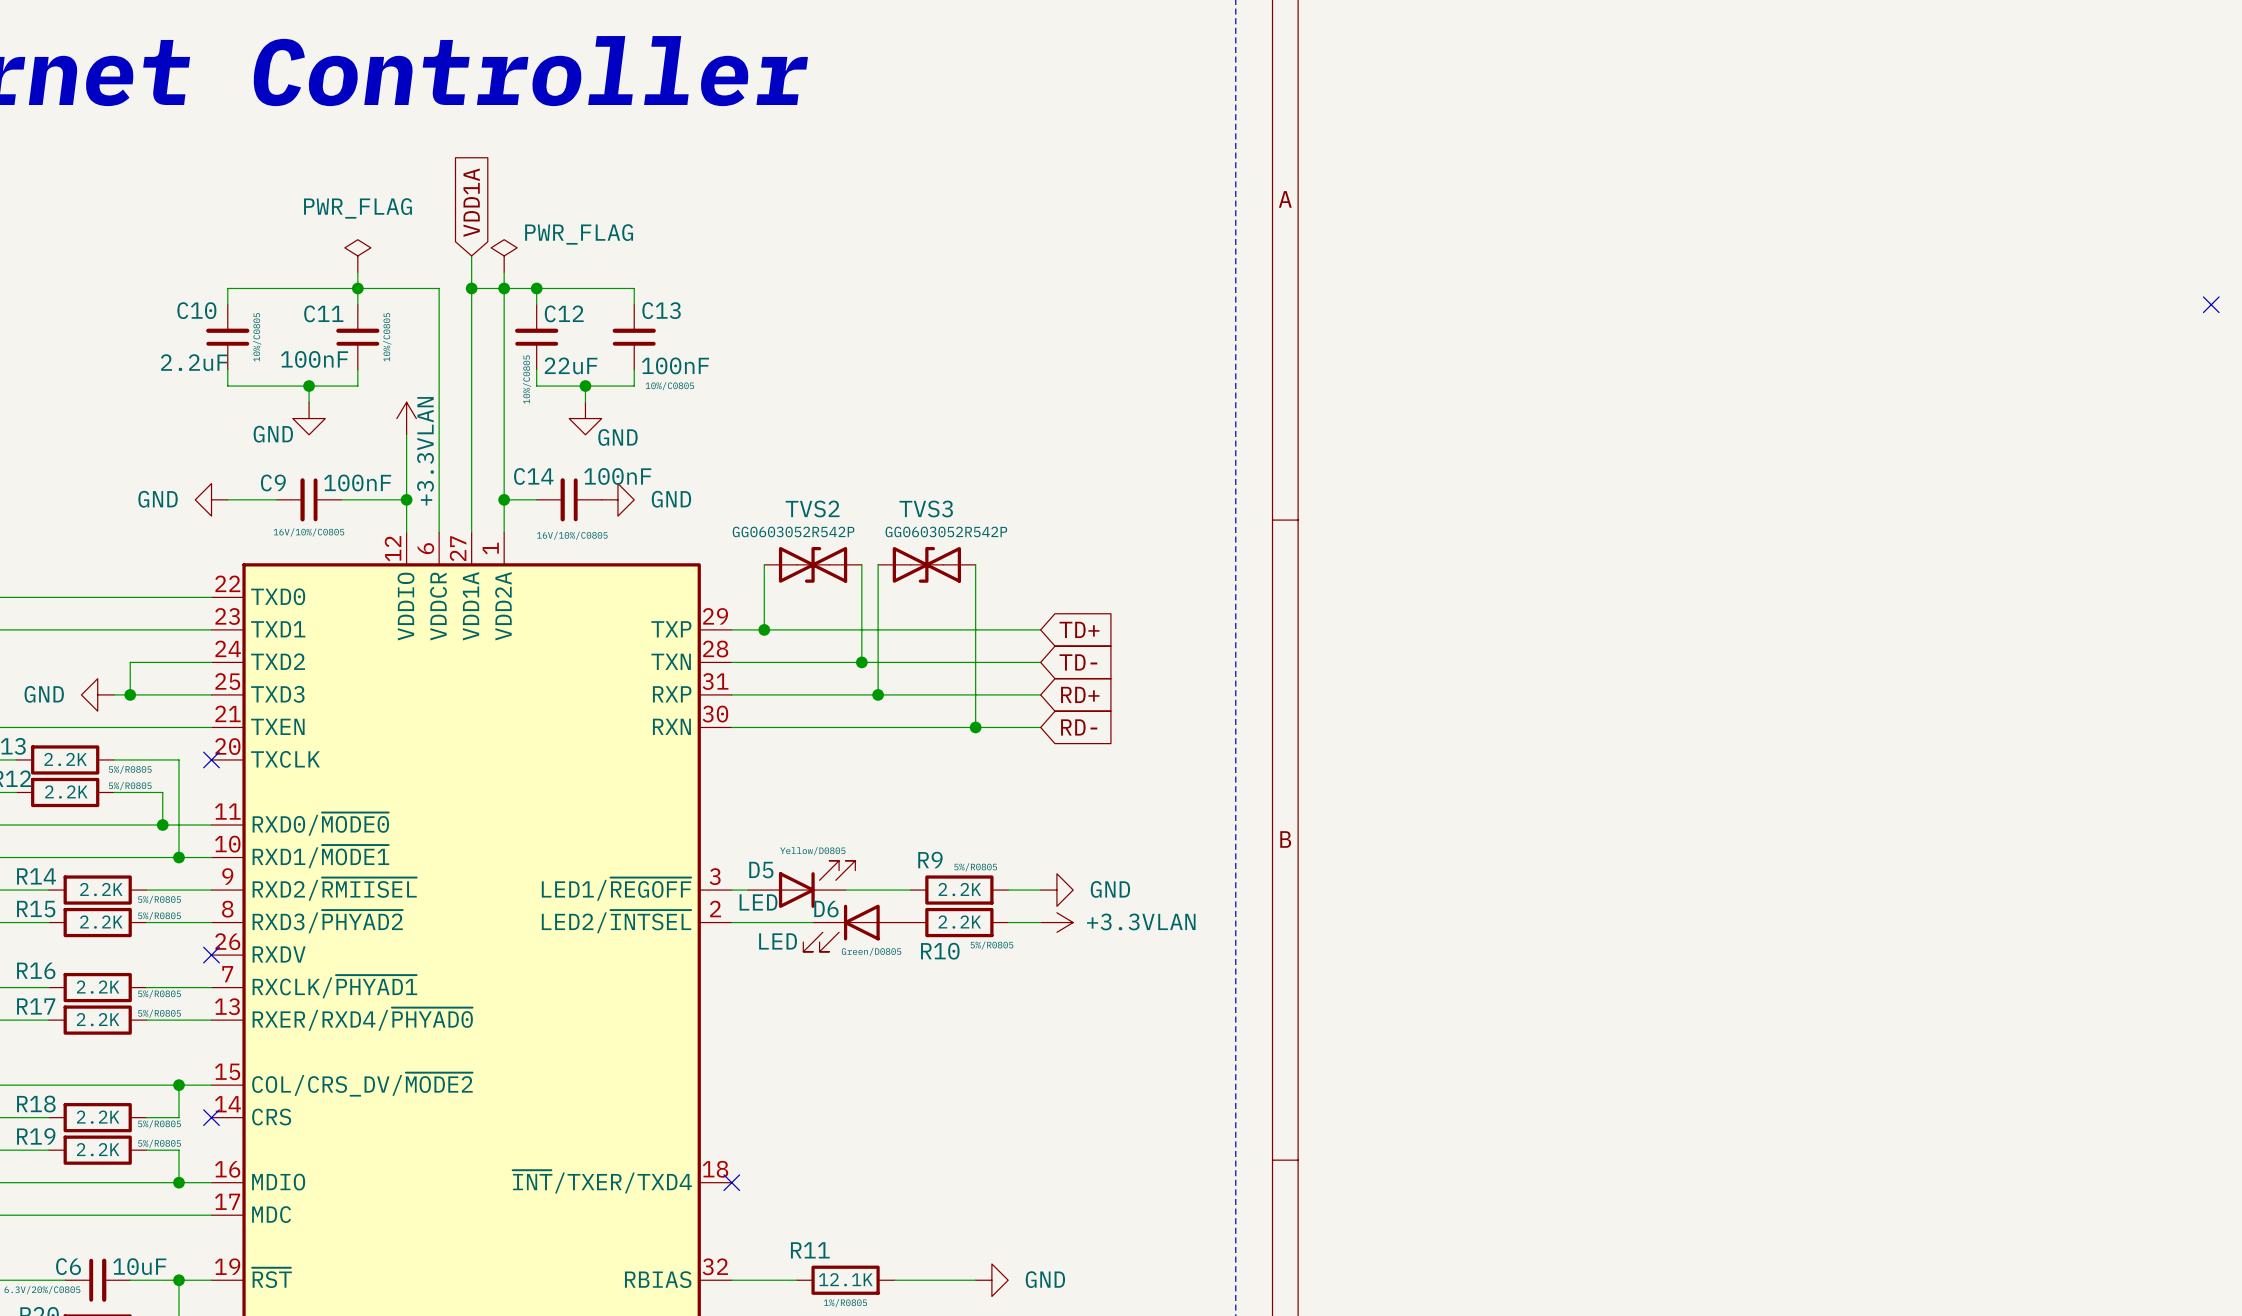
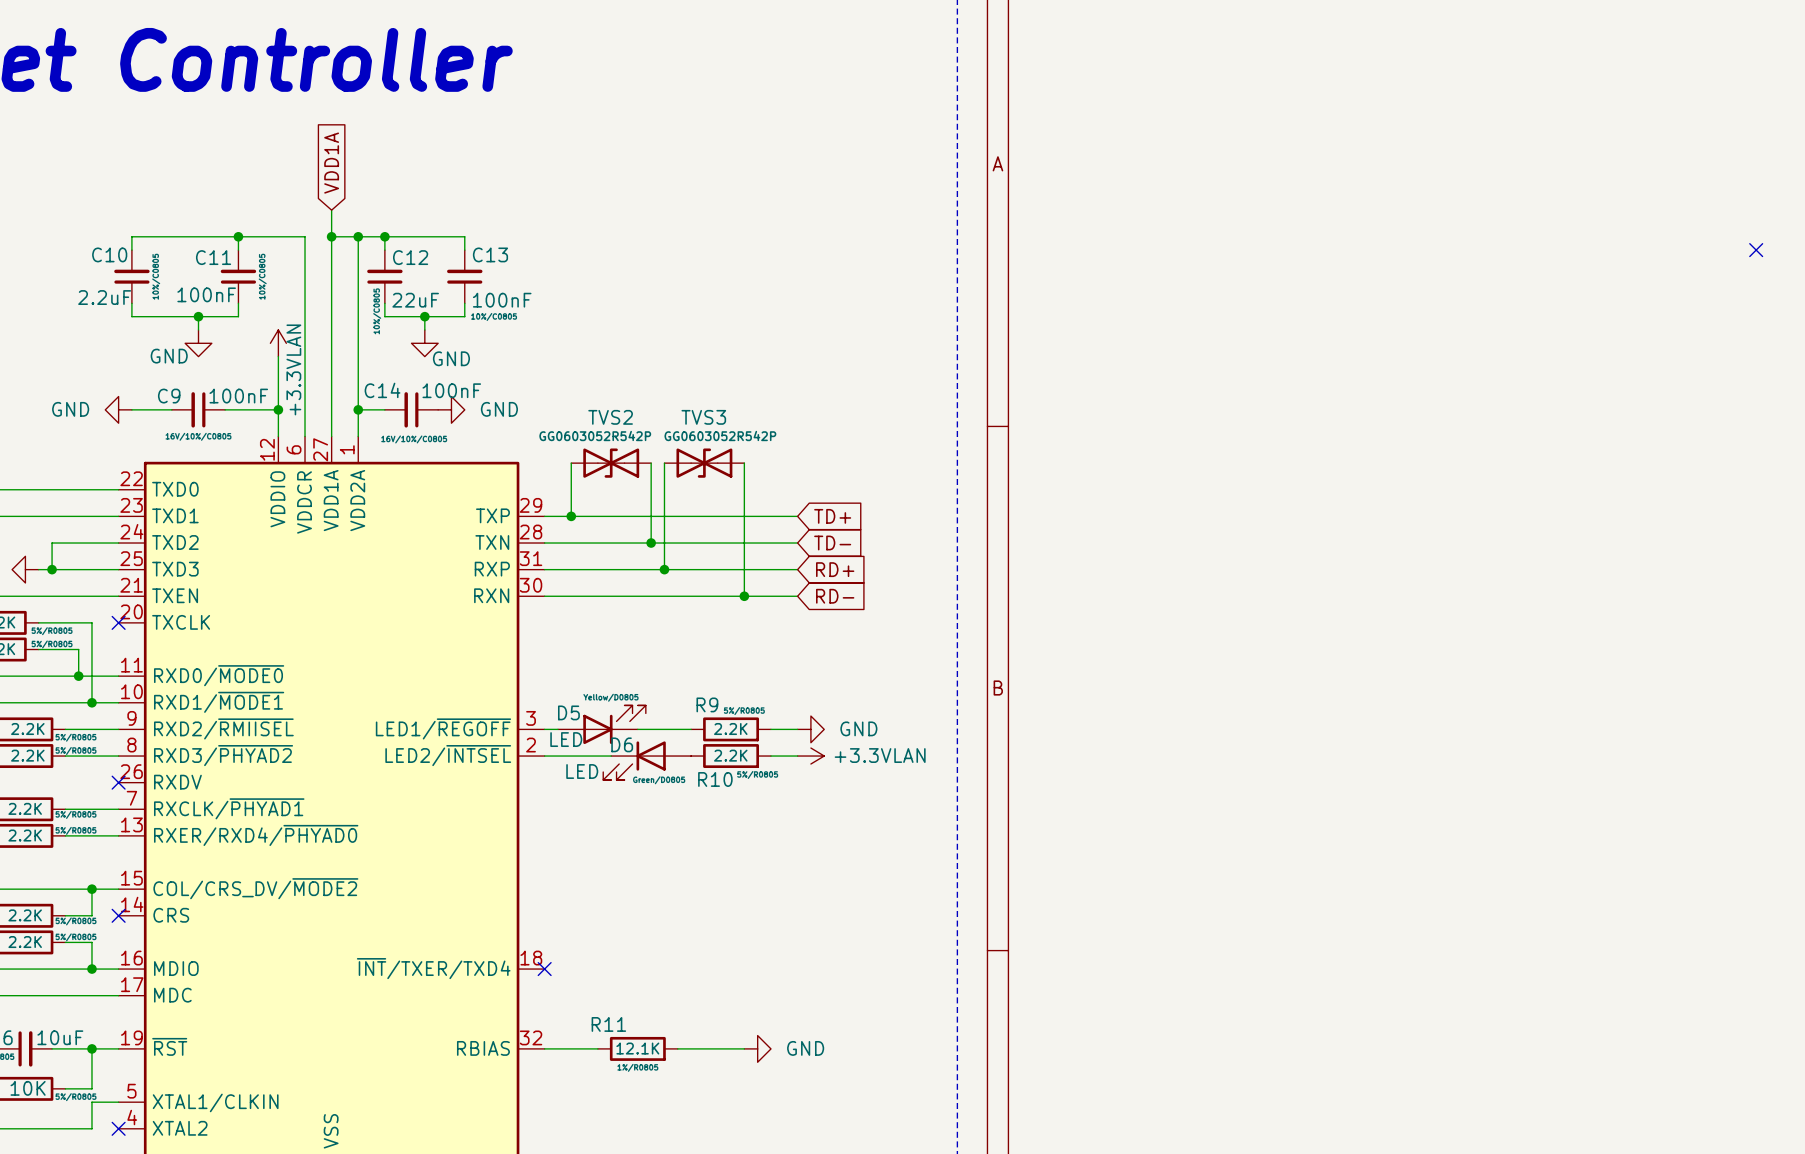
power symbol: PWR_FLAG (357, 255) -> none
power symbol: PWR_FLAG (504, 255) -> none
wire: (357, 272) (357, 288) -> none
wire: (504, 272) (504, 288) -> none

